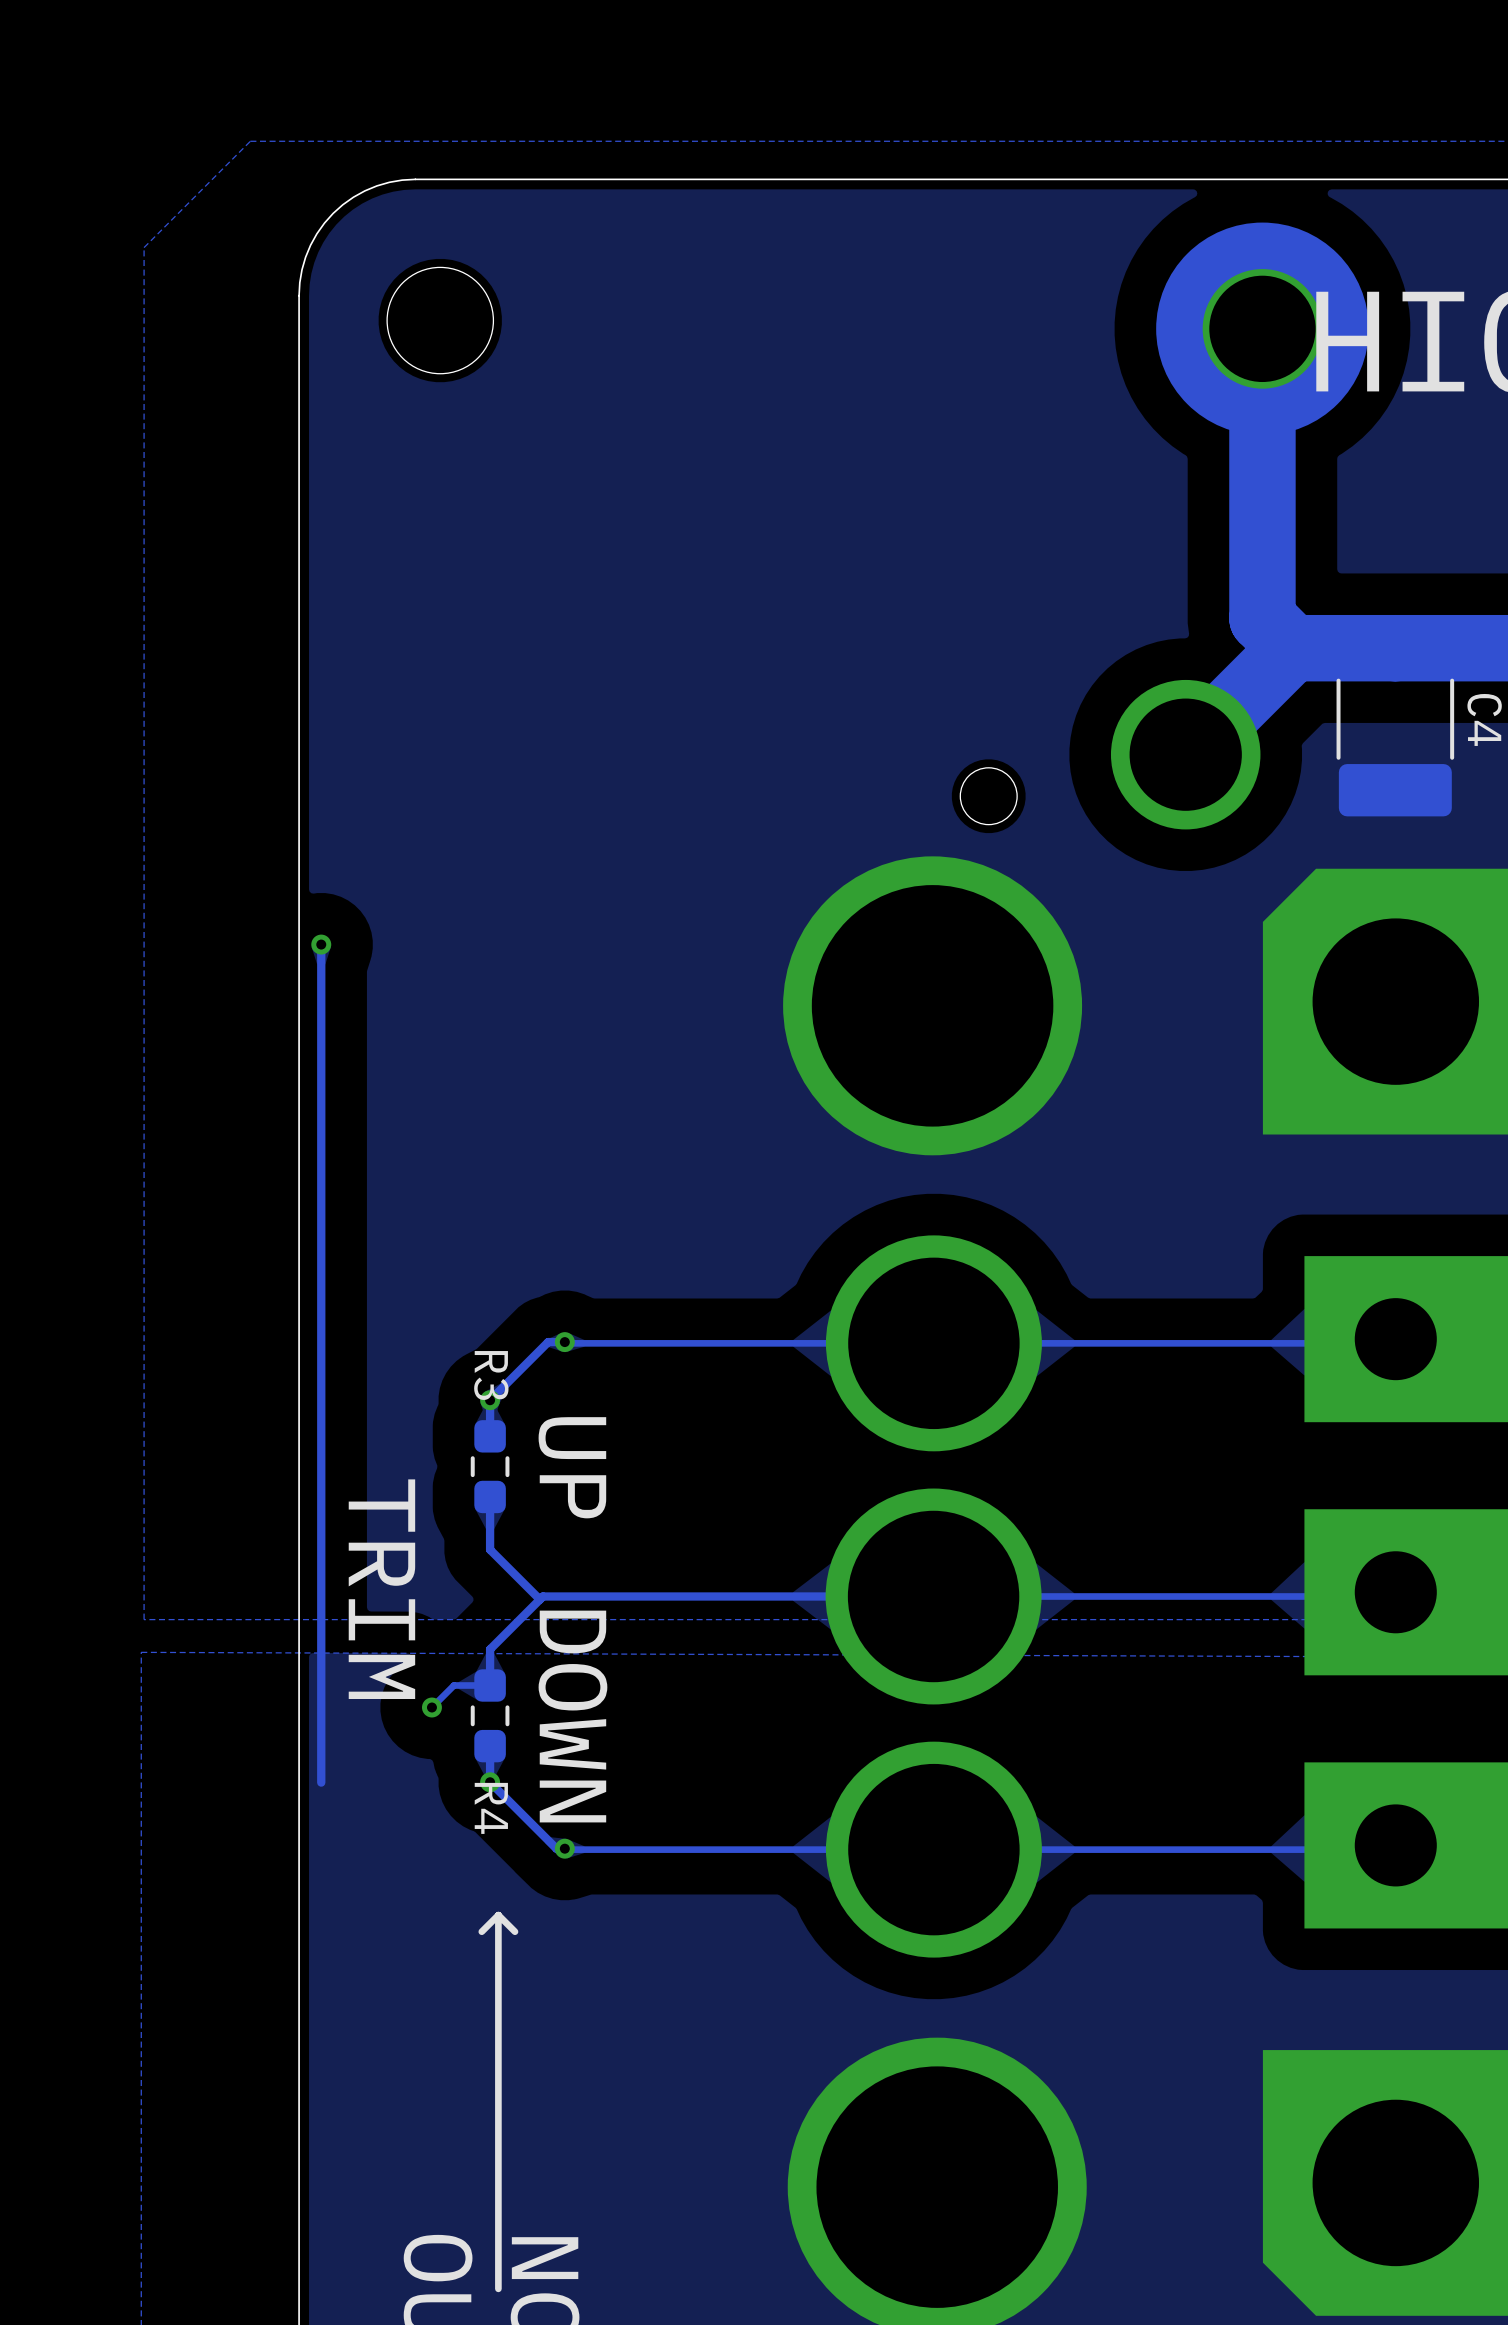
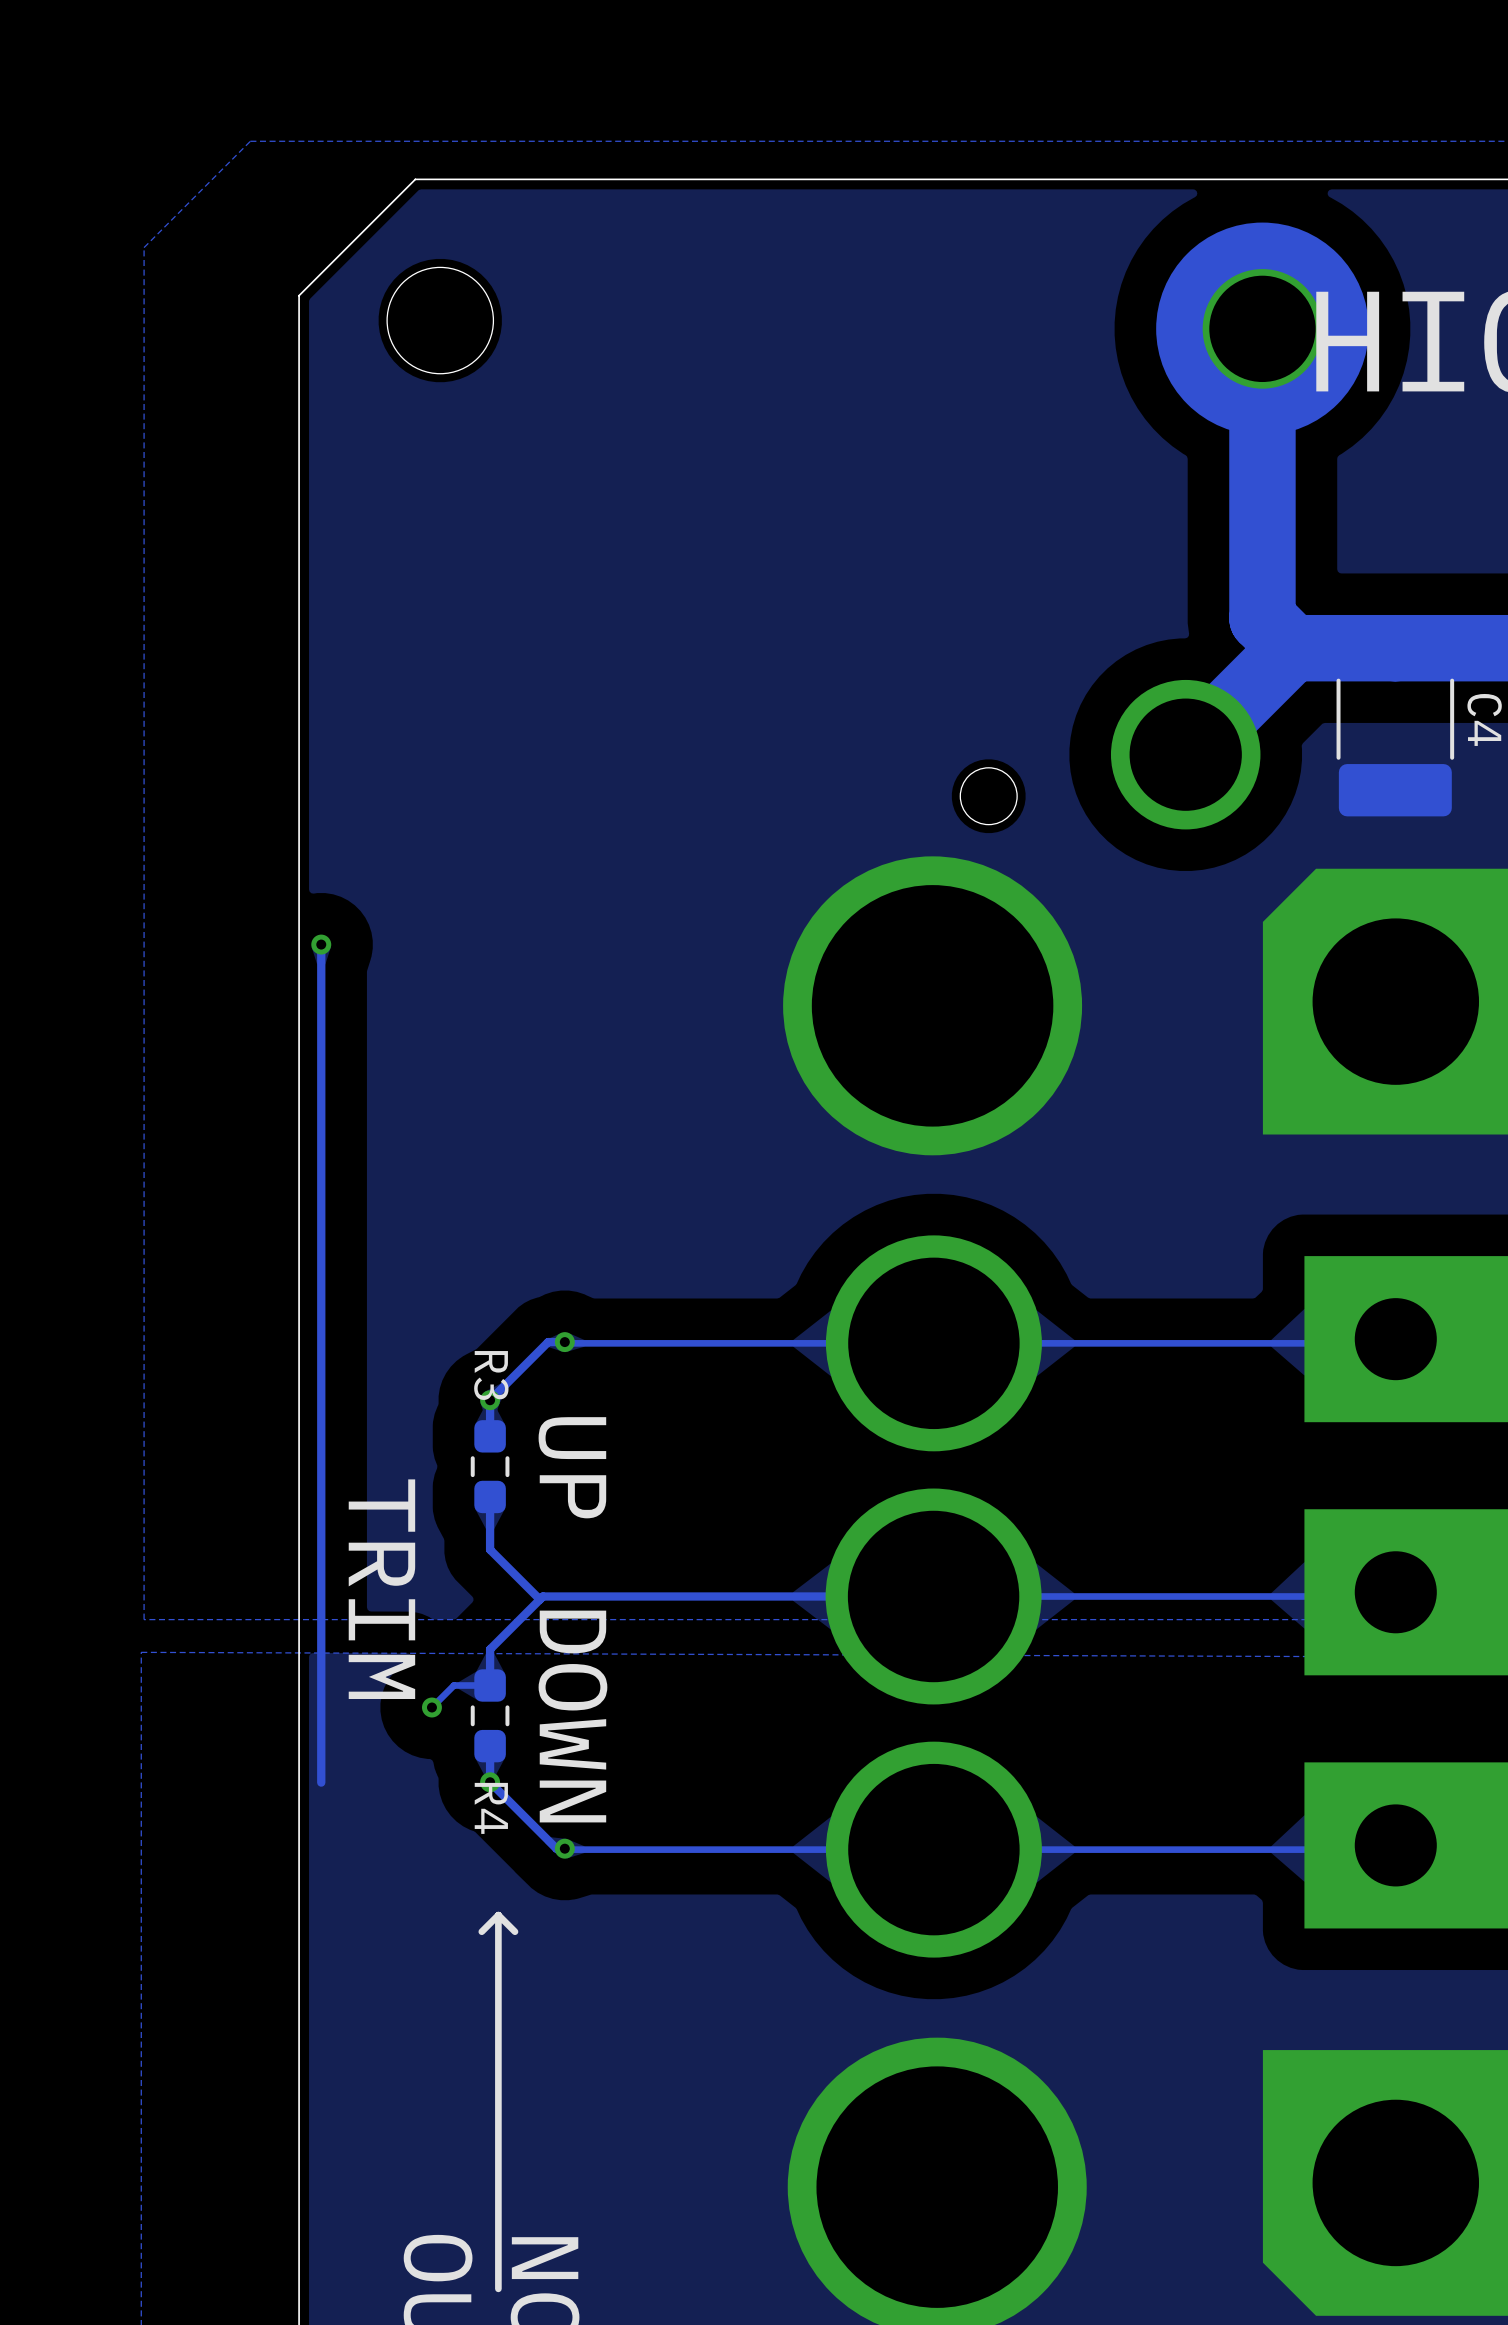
board edge: (415, 179) (389, 182) (364, 190) (333, 213) (316, 233) (305, 257) (299, 295) -> (415, 179) (299, 295)

